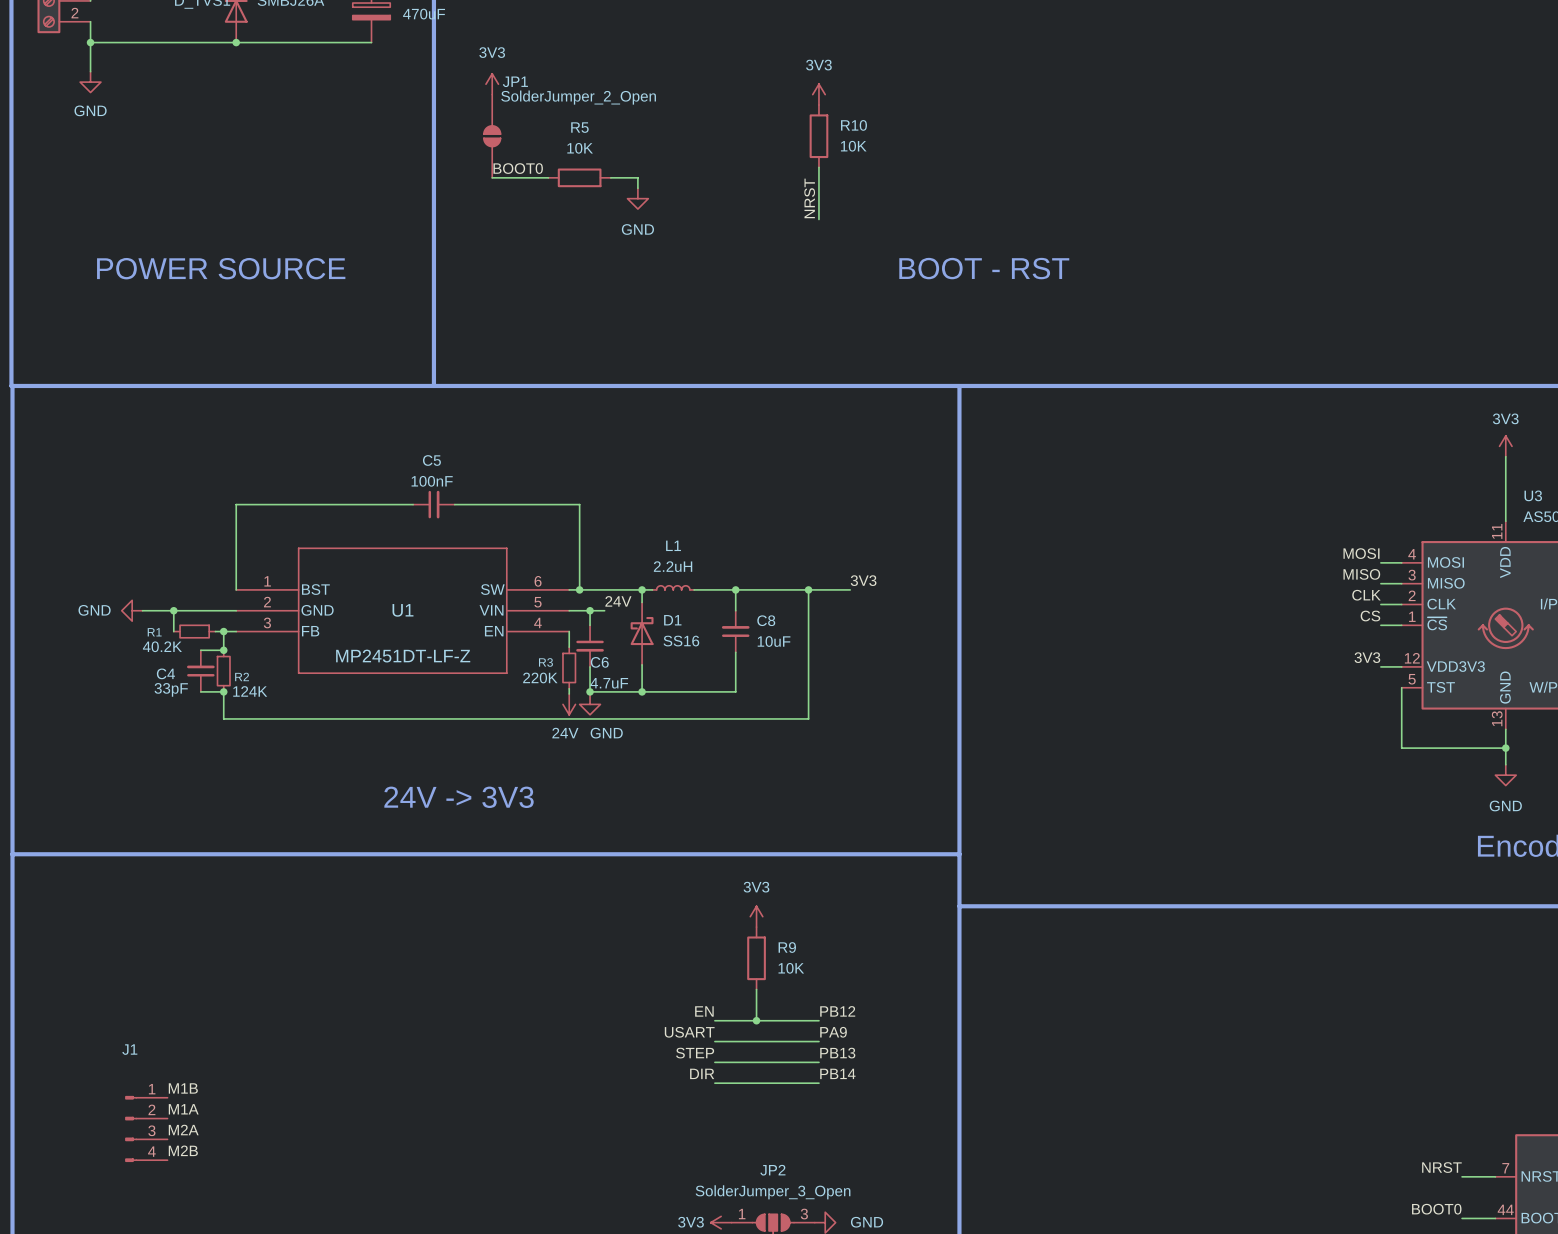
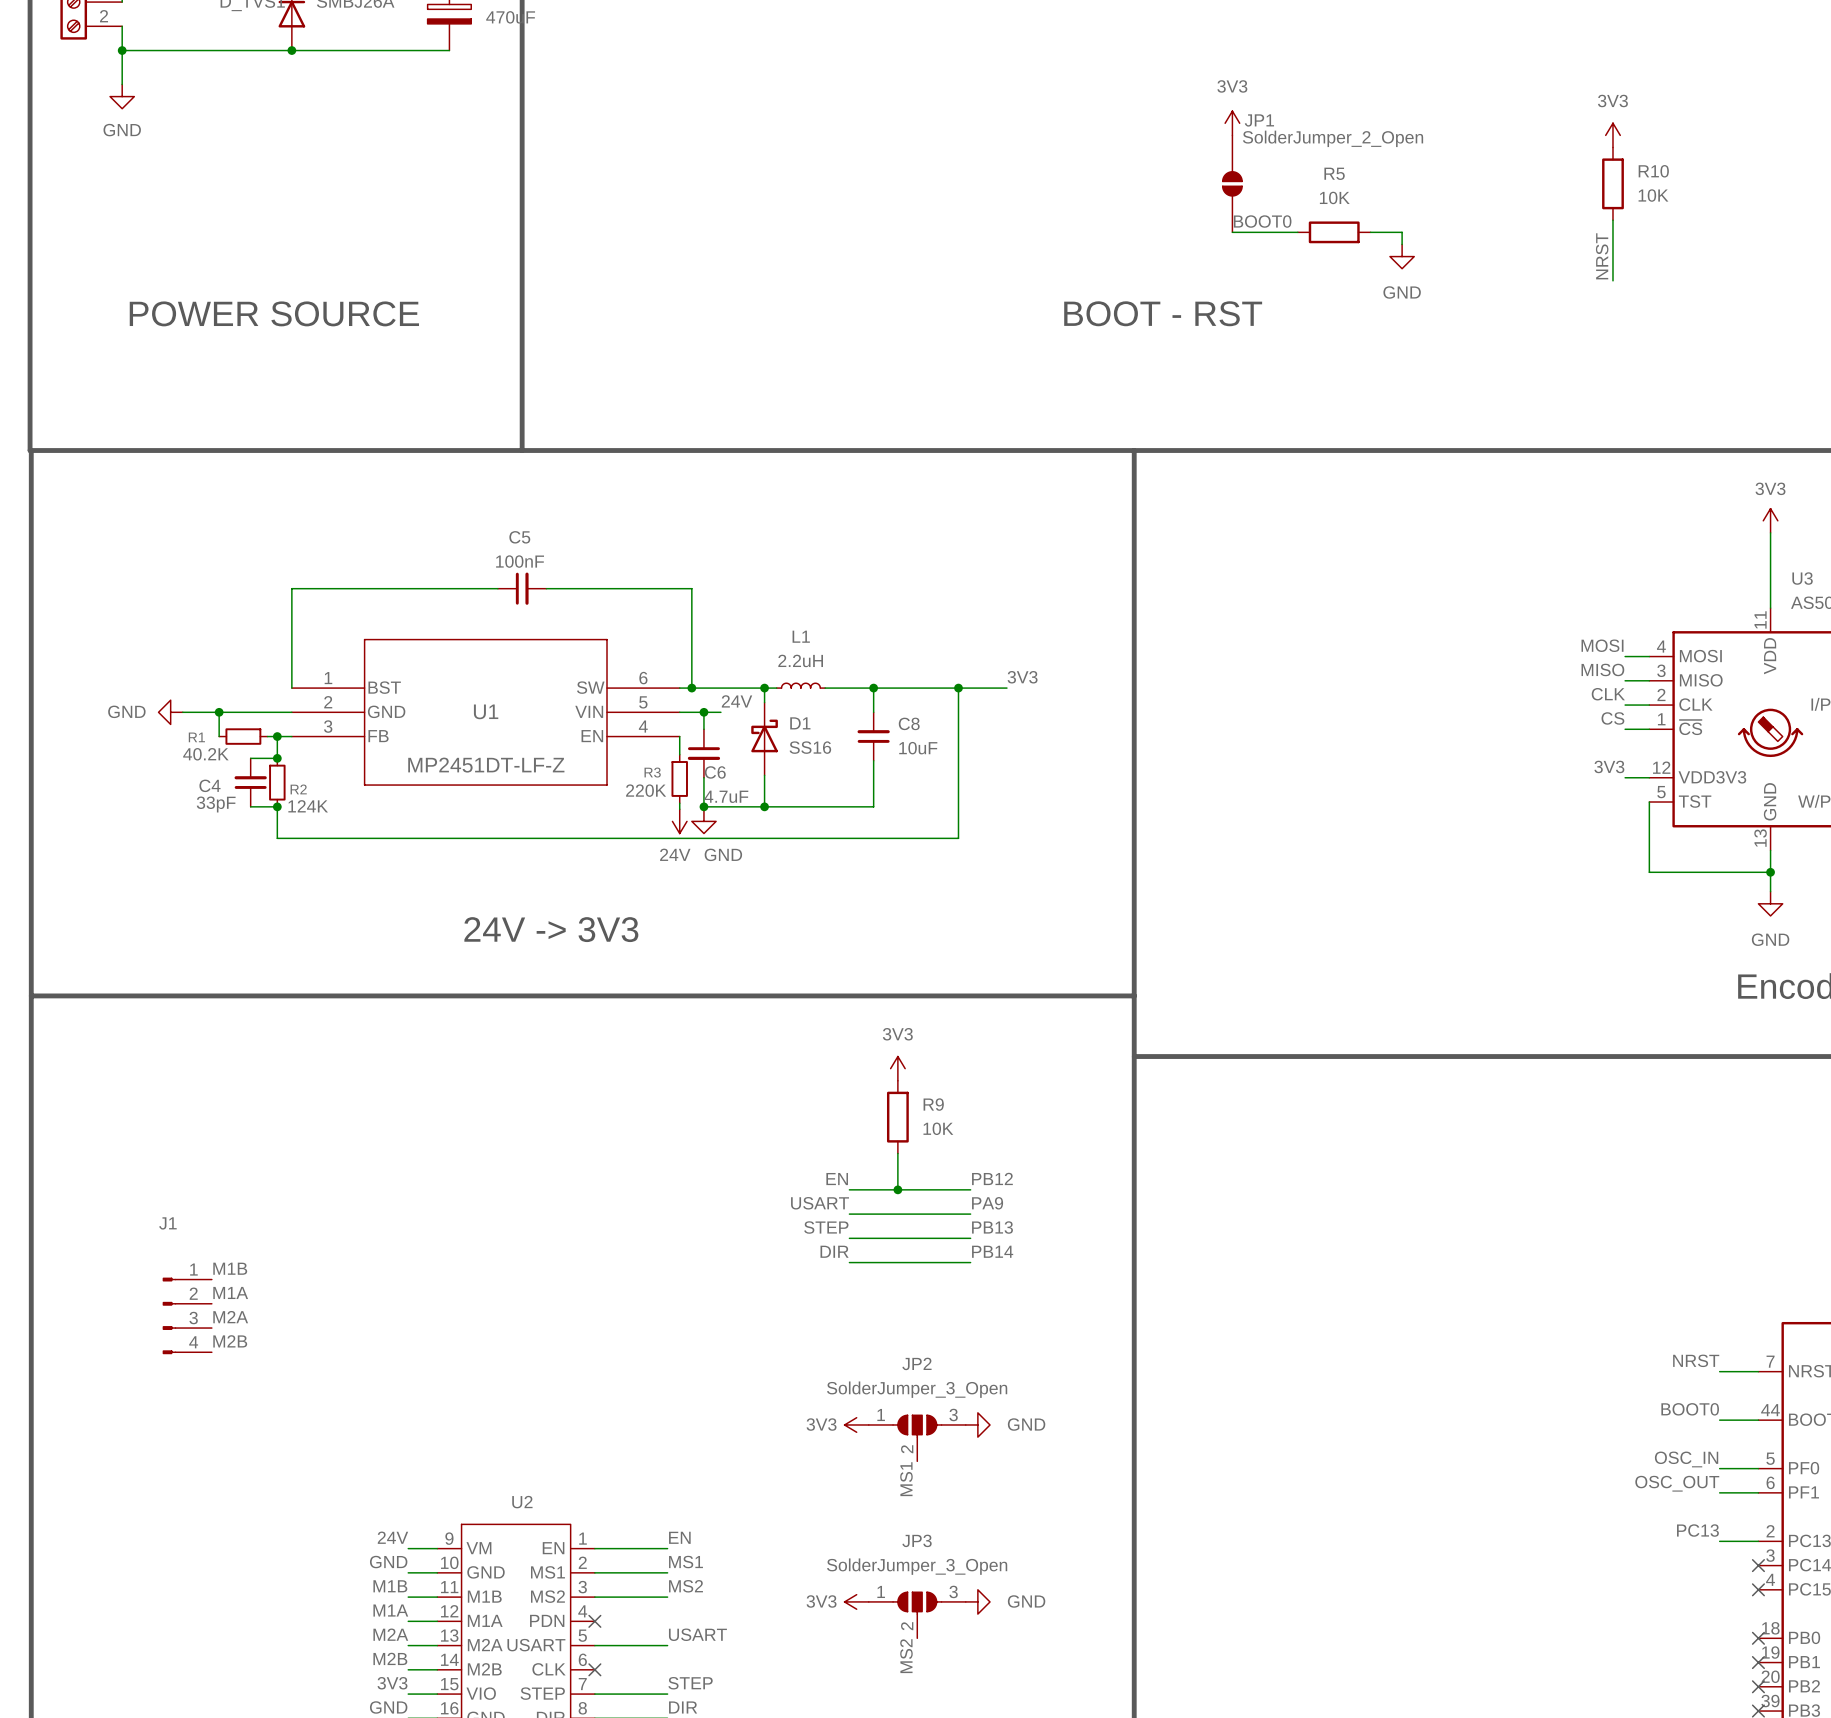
power symbol: 3V3 (492, 84) -> none
power symbol: 3V3 (818, 94) -> none
power symbol: none -> 3V3 (1232, 123)
power symbol: none -> 3V3 (1612, 135)
JP1 position: (492, 136) -> (1232, 183)
R10 position: (818, 136) -> (1612, 183)
wire: (818, 167) (818, 219) -> none
label: BOOT0 (518, 168) -> none
wire: (492, 177) (548, 177) -> none
R5 position: (579, 177) -> (1334, 232)
wire: (610, 177) (637, 177) (637, 188) -> none
wire: none -> (1612, 220) (1612, 280)
label: none -> BOOT0 (1262, 221)
power symbol: GND (637, 198) -> none
label: NRST (809, 198) -> none
wire: none -> (1232, 232) (1297, 232)
wire: none -> (1370, 232) (1402, 232) (1402, 244)
power symbol: none -> GND (1402, 256)
label: none -> NRST (1602, 256)

